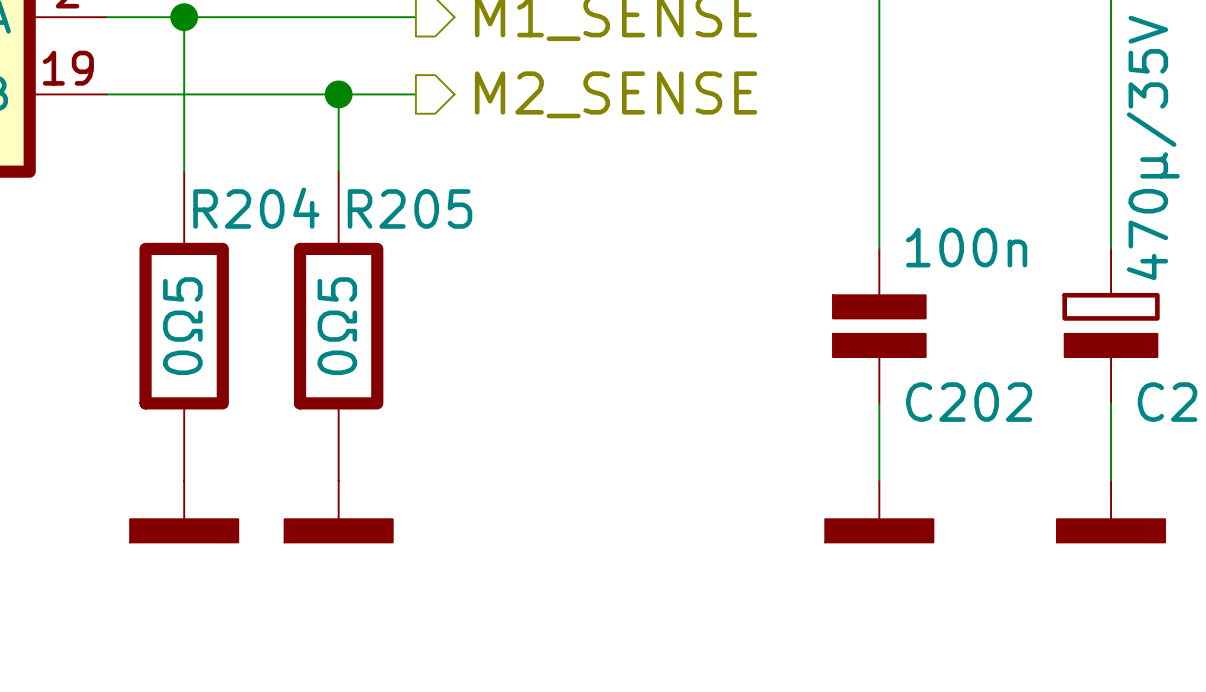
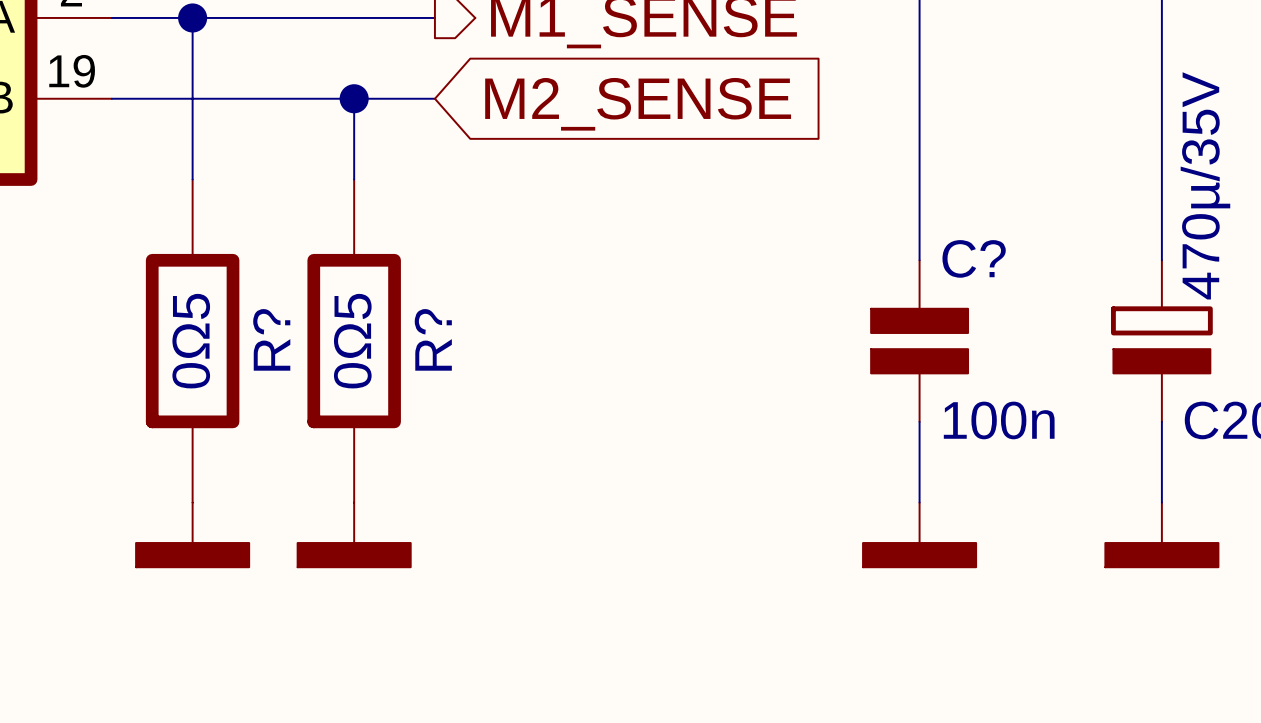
hierarchical label: M2_SENSE (616, 94) -> none
global label: none -> M2_SENSE (638, 104)
R204 name: R204 (256, 208) -> R? (271, 339)
R205 name: R205 (409, 208) -> R? (433, 339)
C202 value position: 100n (966, 247) -> 100n (999, 420)
C202 name: C202 (969, 402) -> C? (974, 258)

